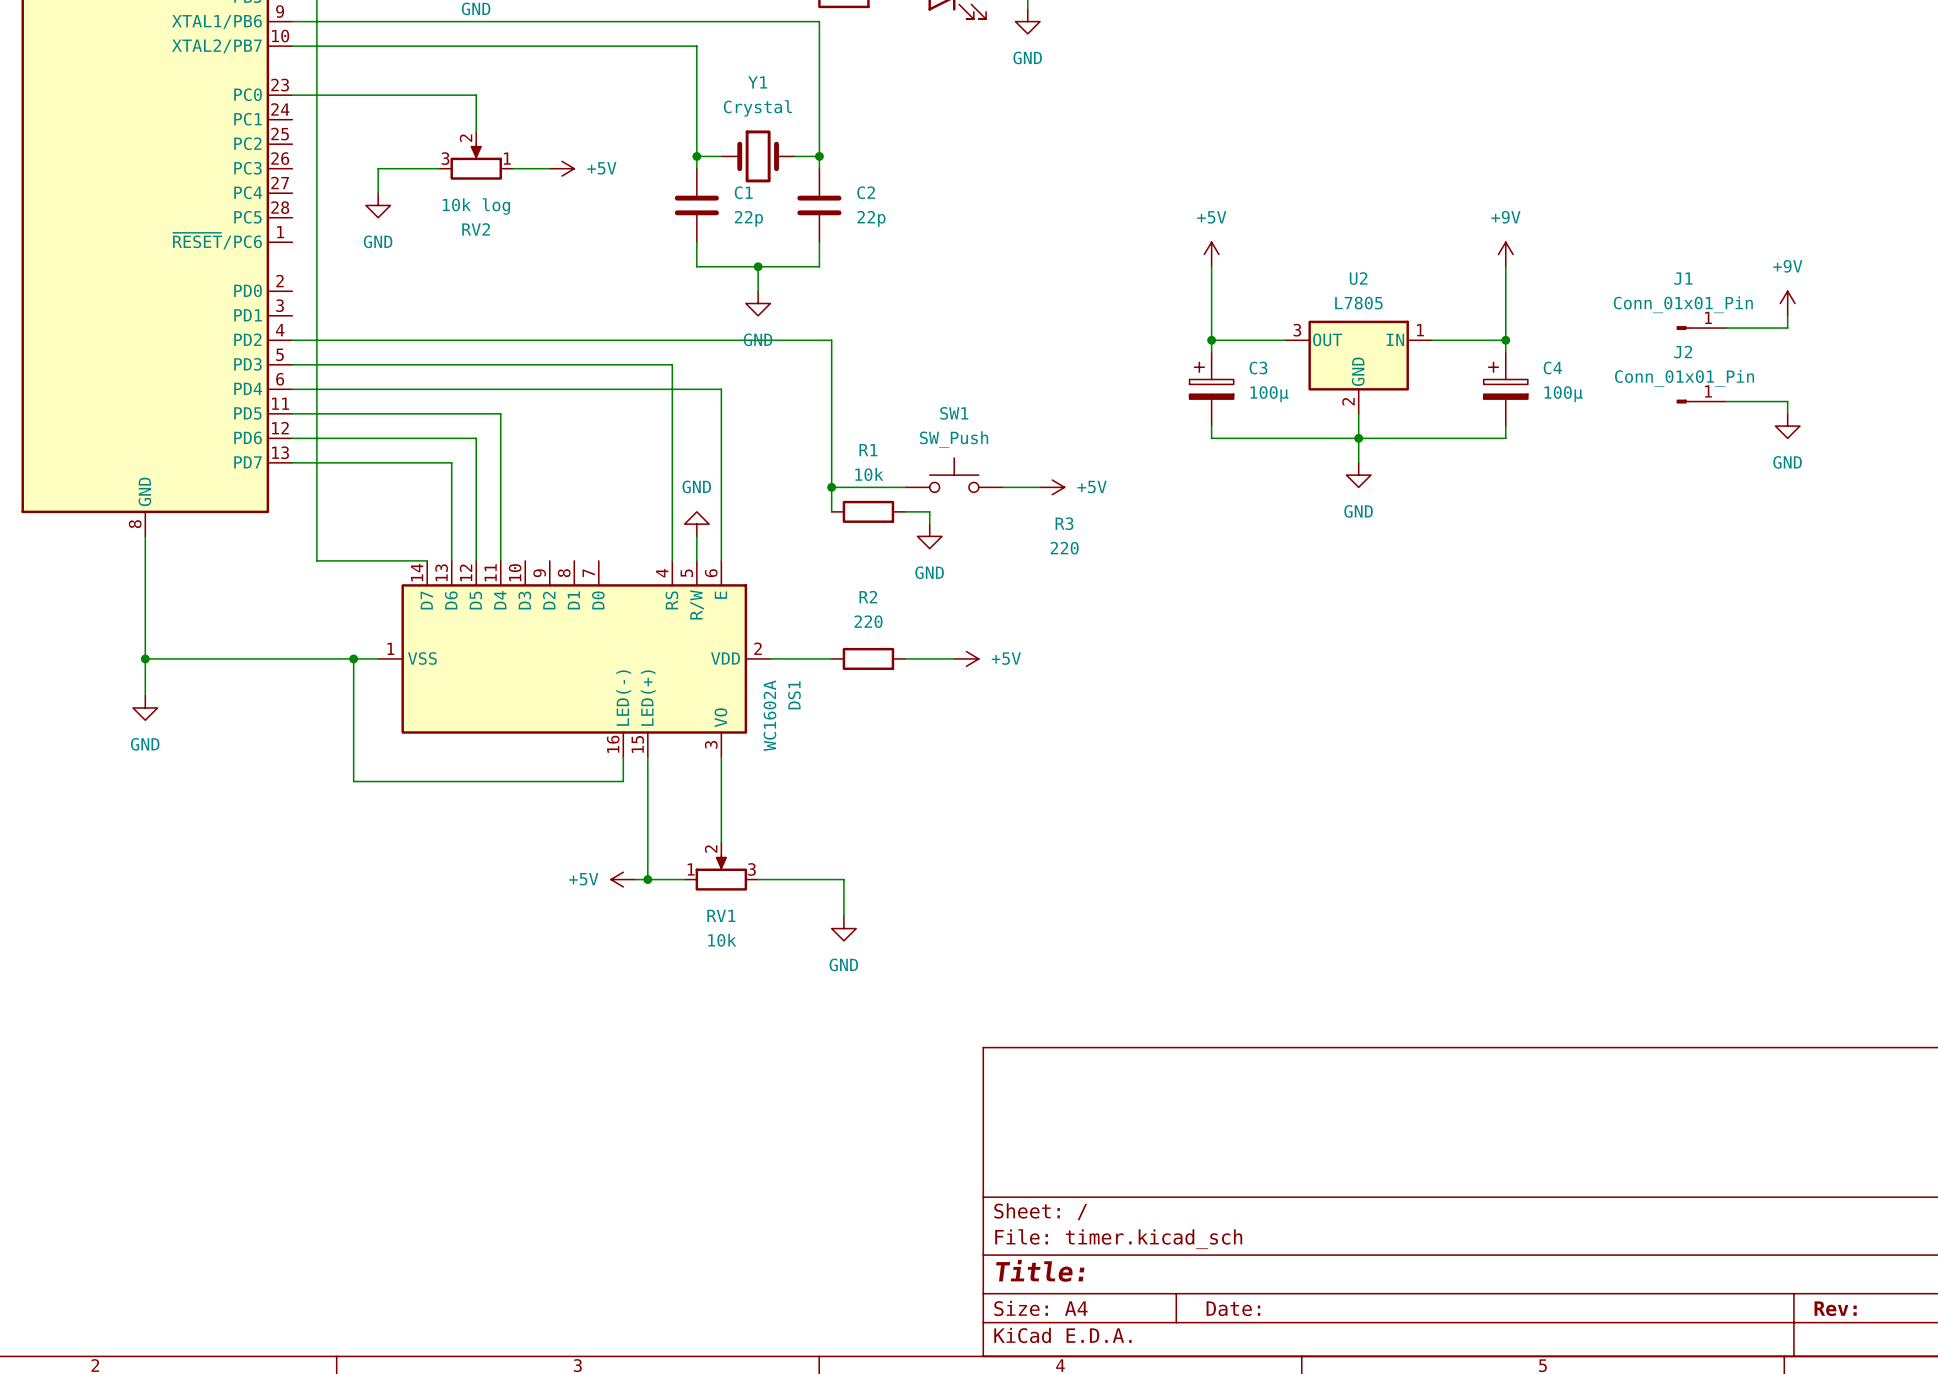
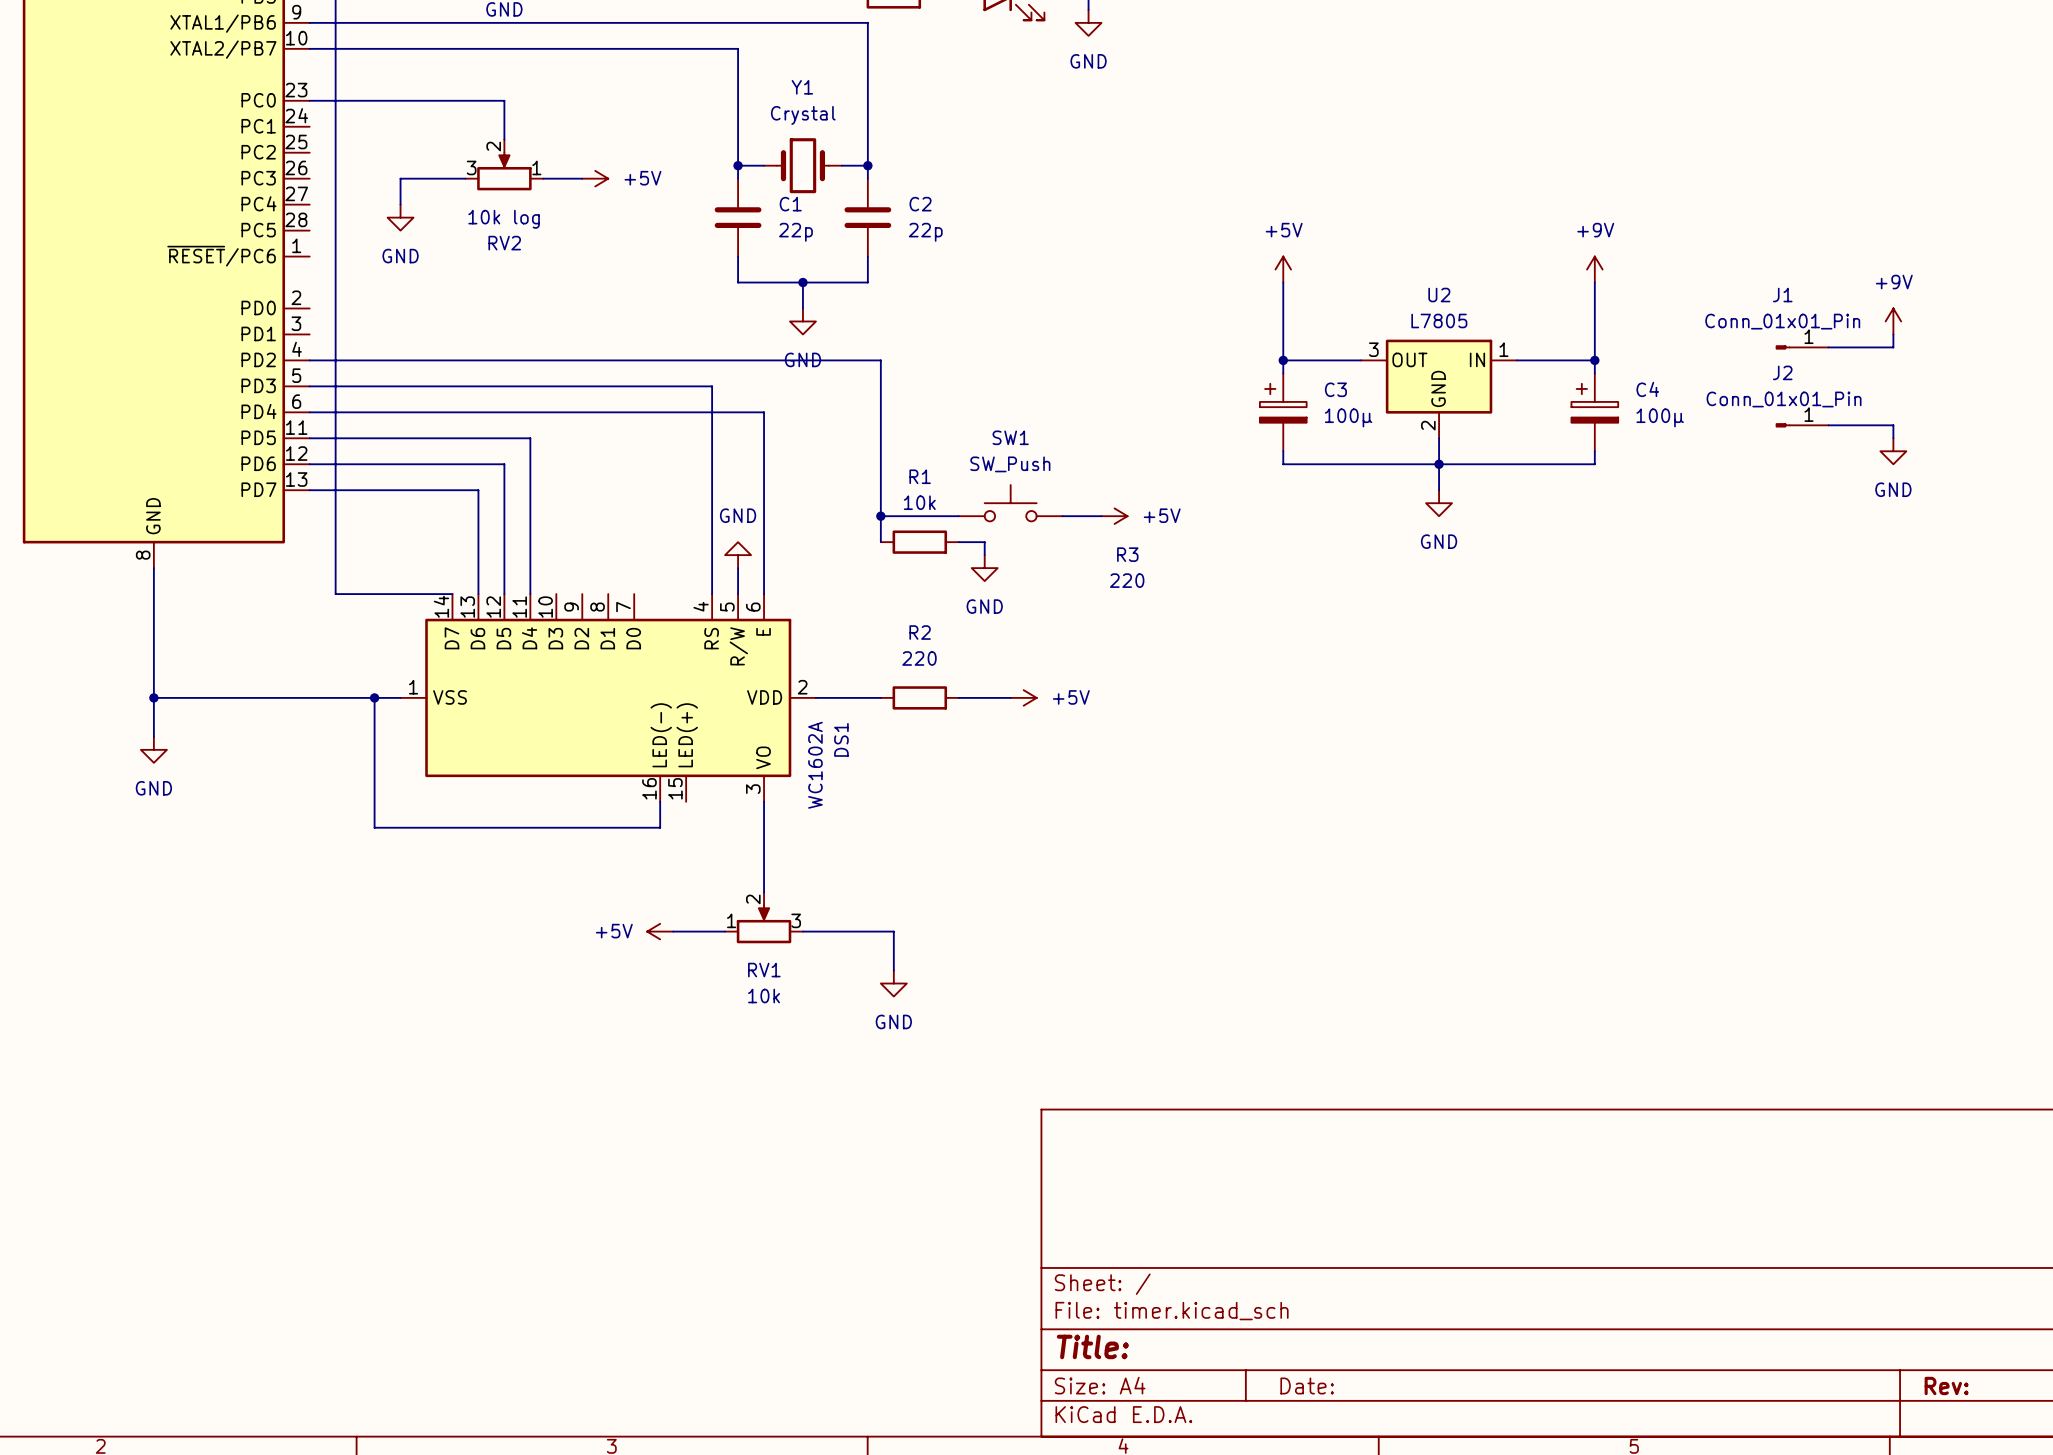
wire: (647, 757) (647, 879) -> none
junction: (647, 879) -> none

